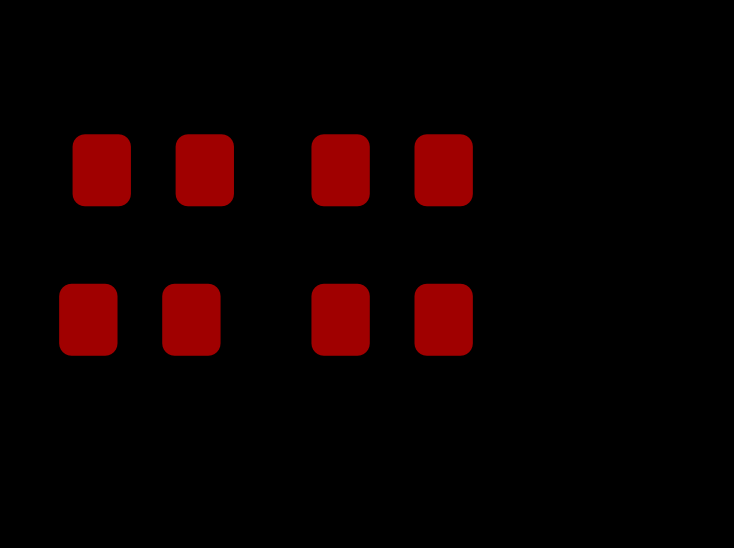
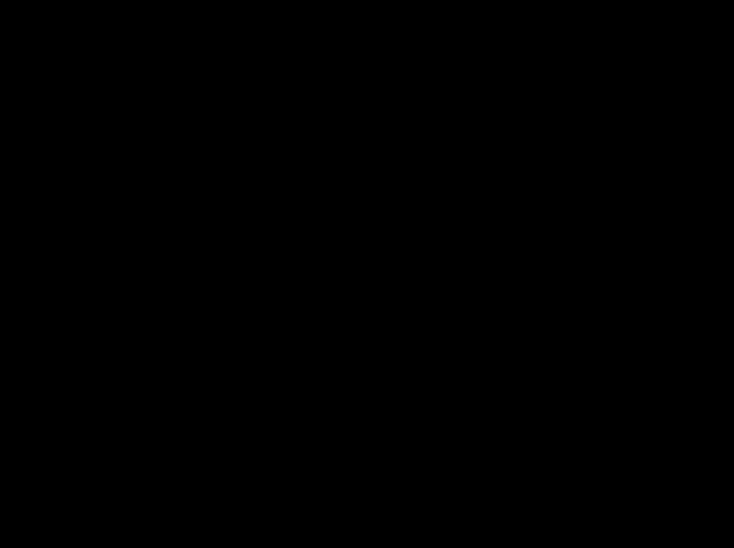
part: (153, 170) -> none
part: (392, 170) -> none
part: (139, 319) -> none
part: (392, 319) -> none

